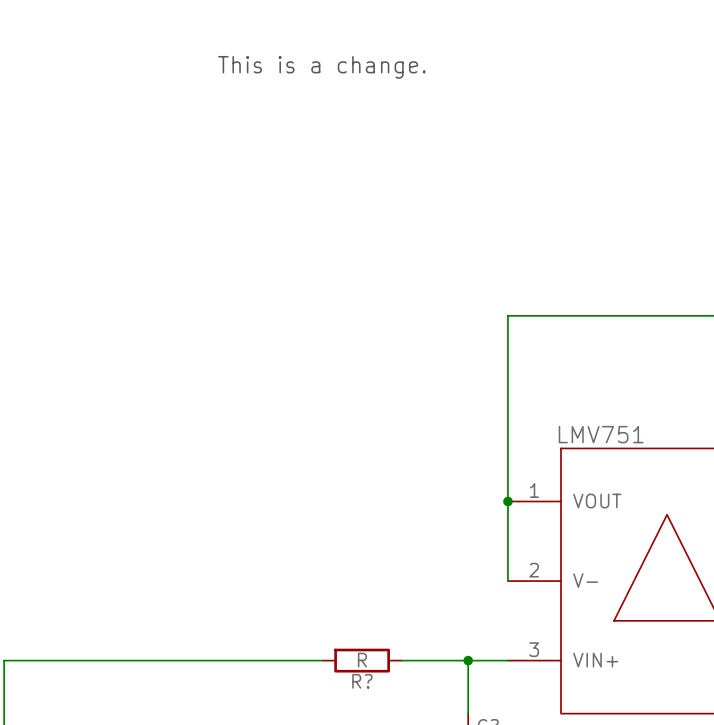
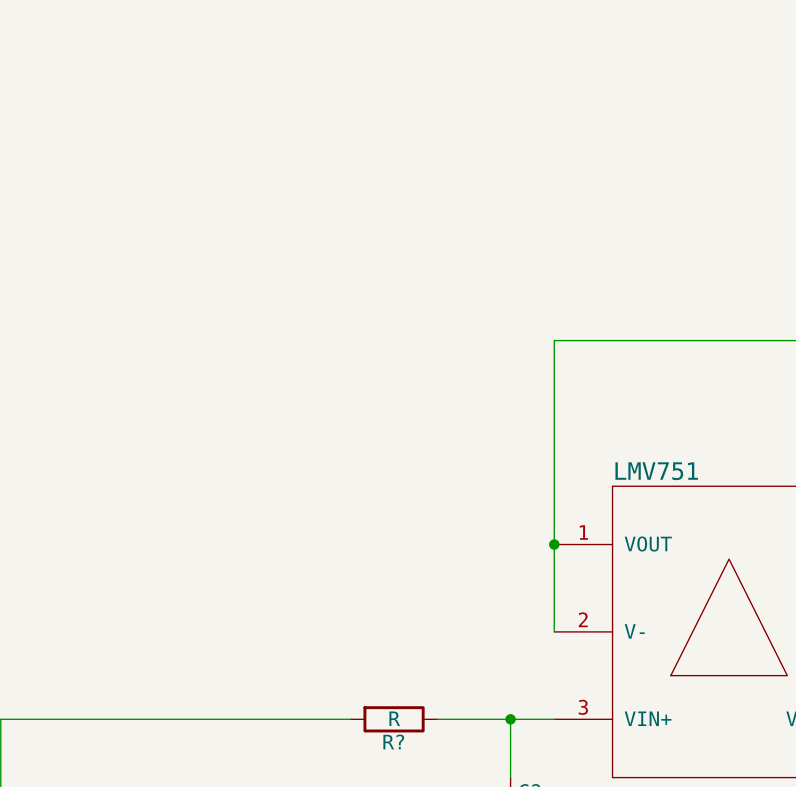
text: This is a change. (321, 67) -> none

